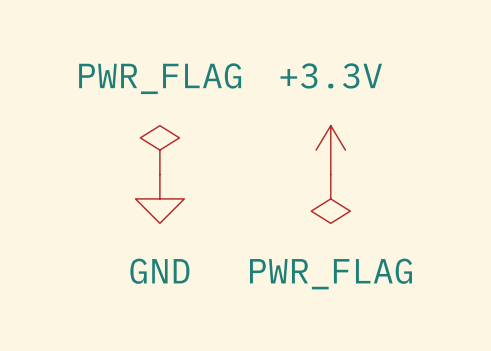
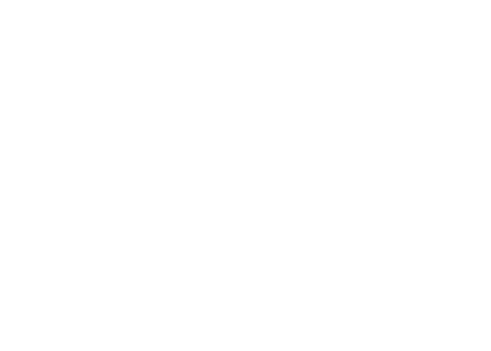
power symbol: PWR_FLAG (159, 150) -> none
power symbol: +3.3V (330, 150) -> none
power symbol: GND (159, 198) -> none
power symbol: PWR_FLAG (330, 198) -> none

